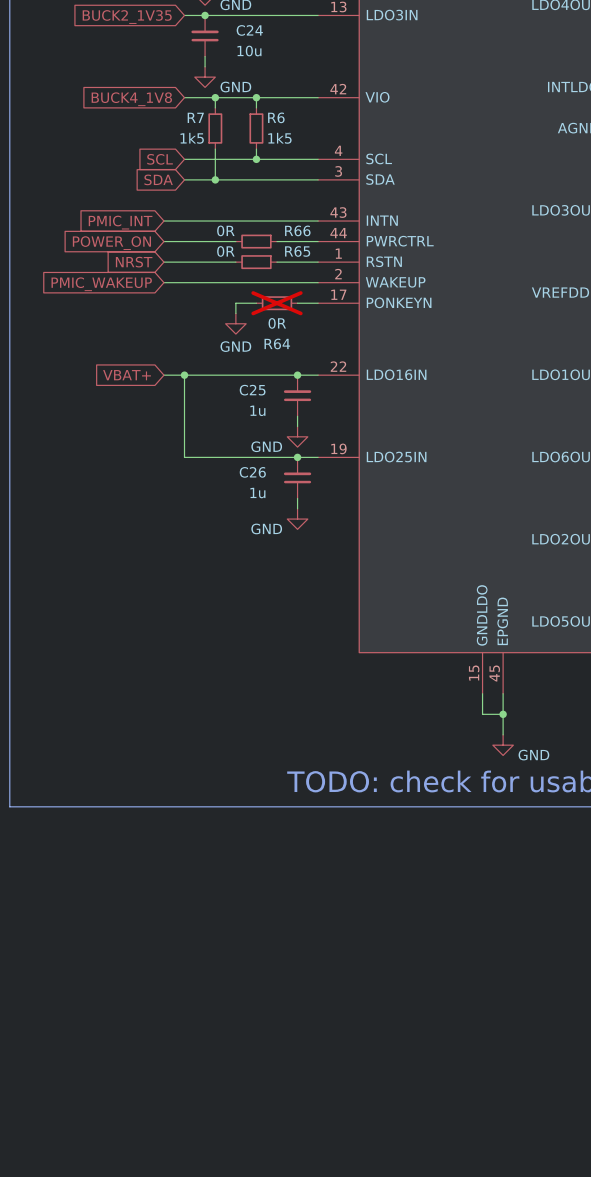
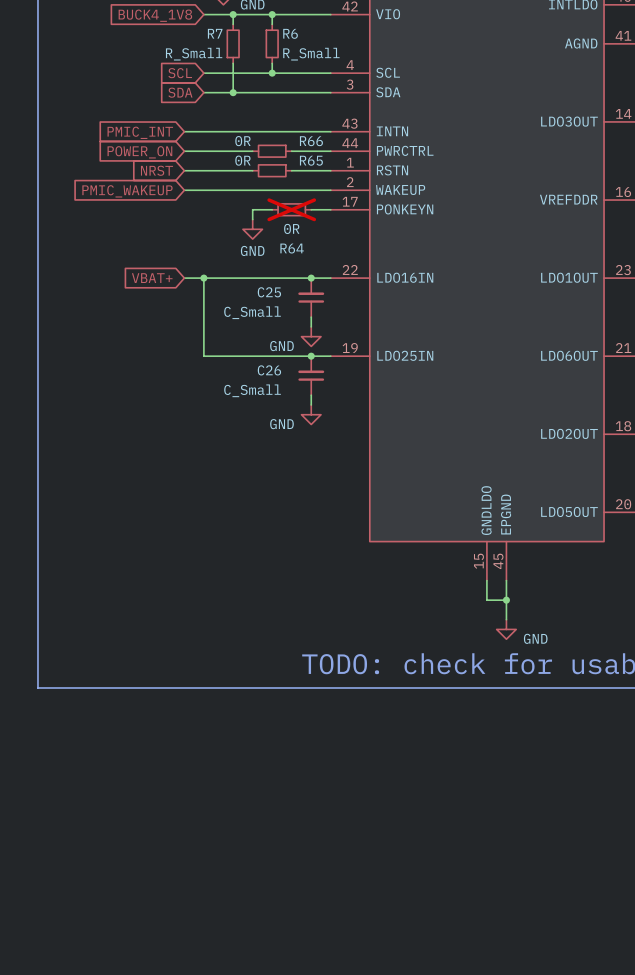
R7 value: 1k5 (192, 138) -> R_Small (194, 54)
R6 value: 1k5 (279, 138) -> R_Small (311, 54)
C25 value: 1u (257, 410) -> C_Small (252, 312)
C26 value: 1u (257, 493) -> C_Small (252, 390)

